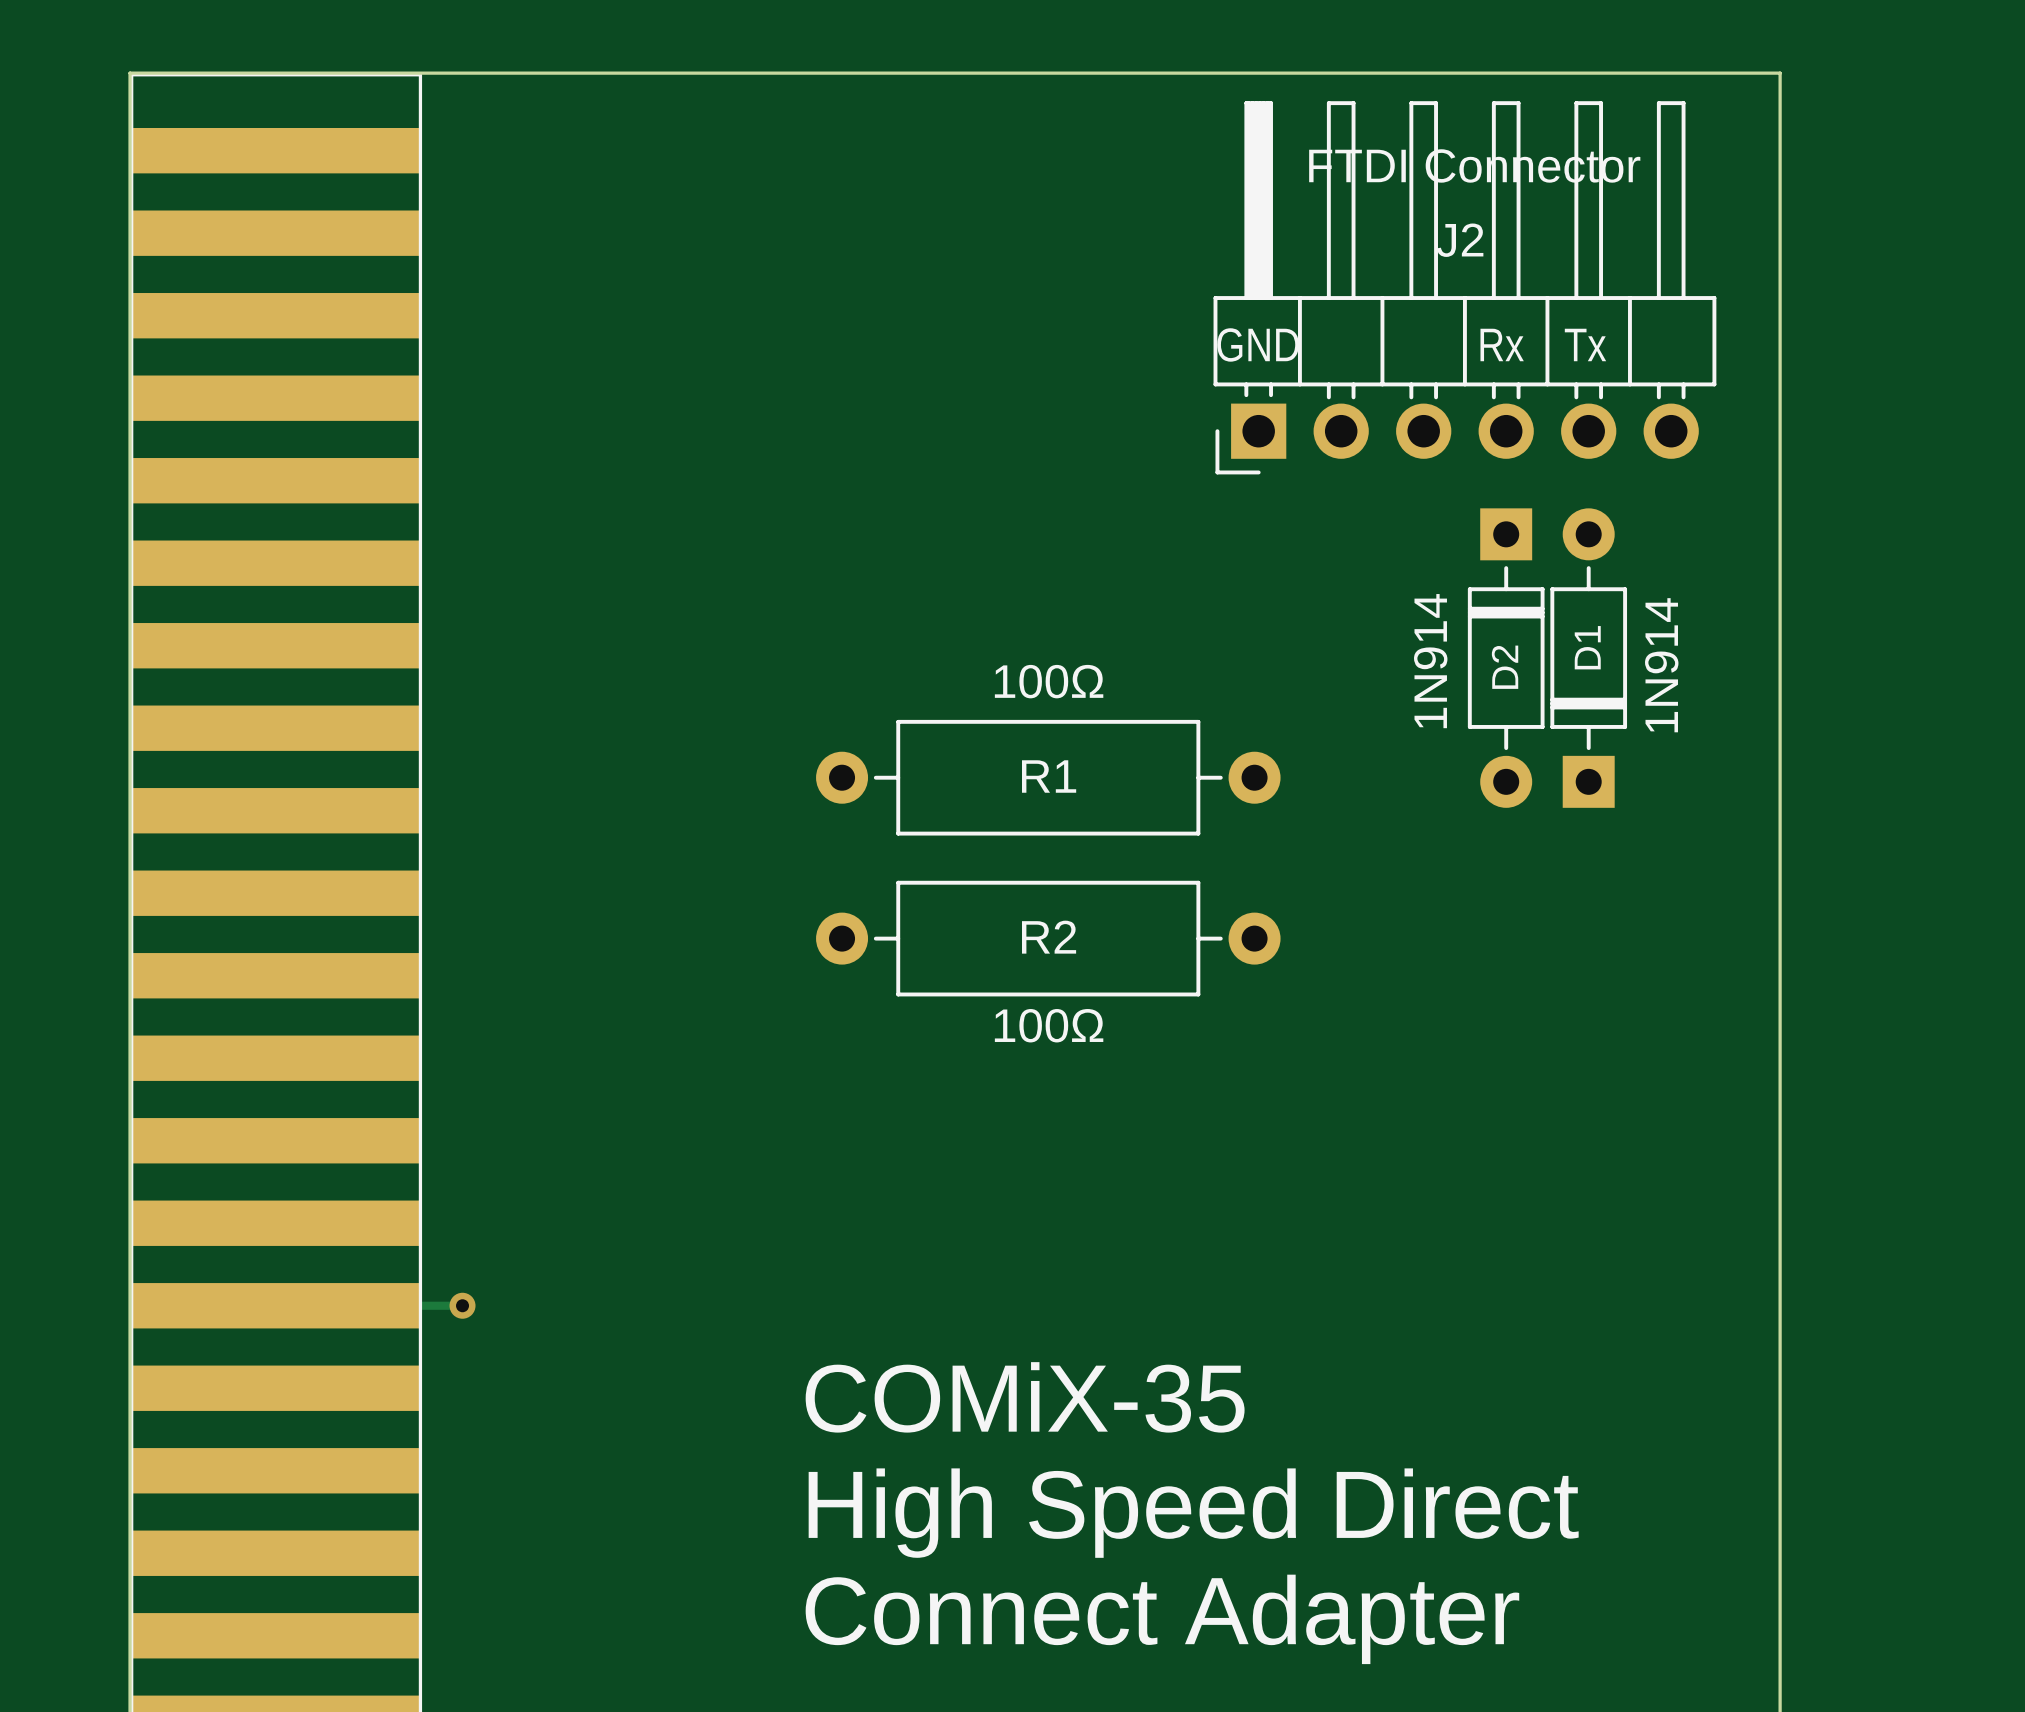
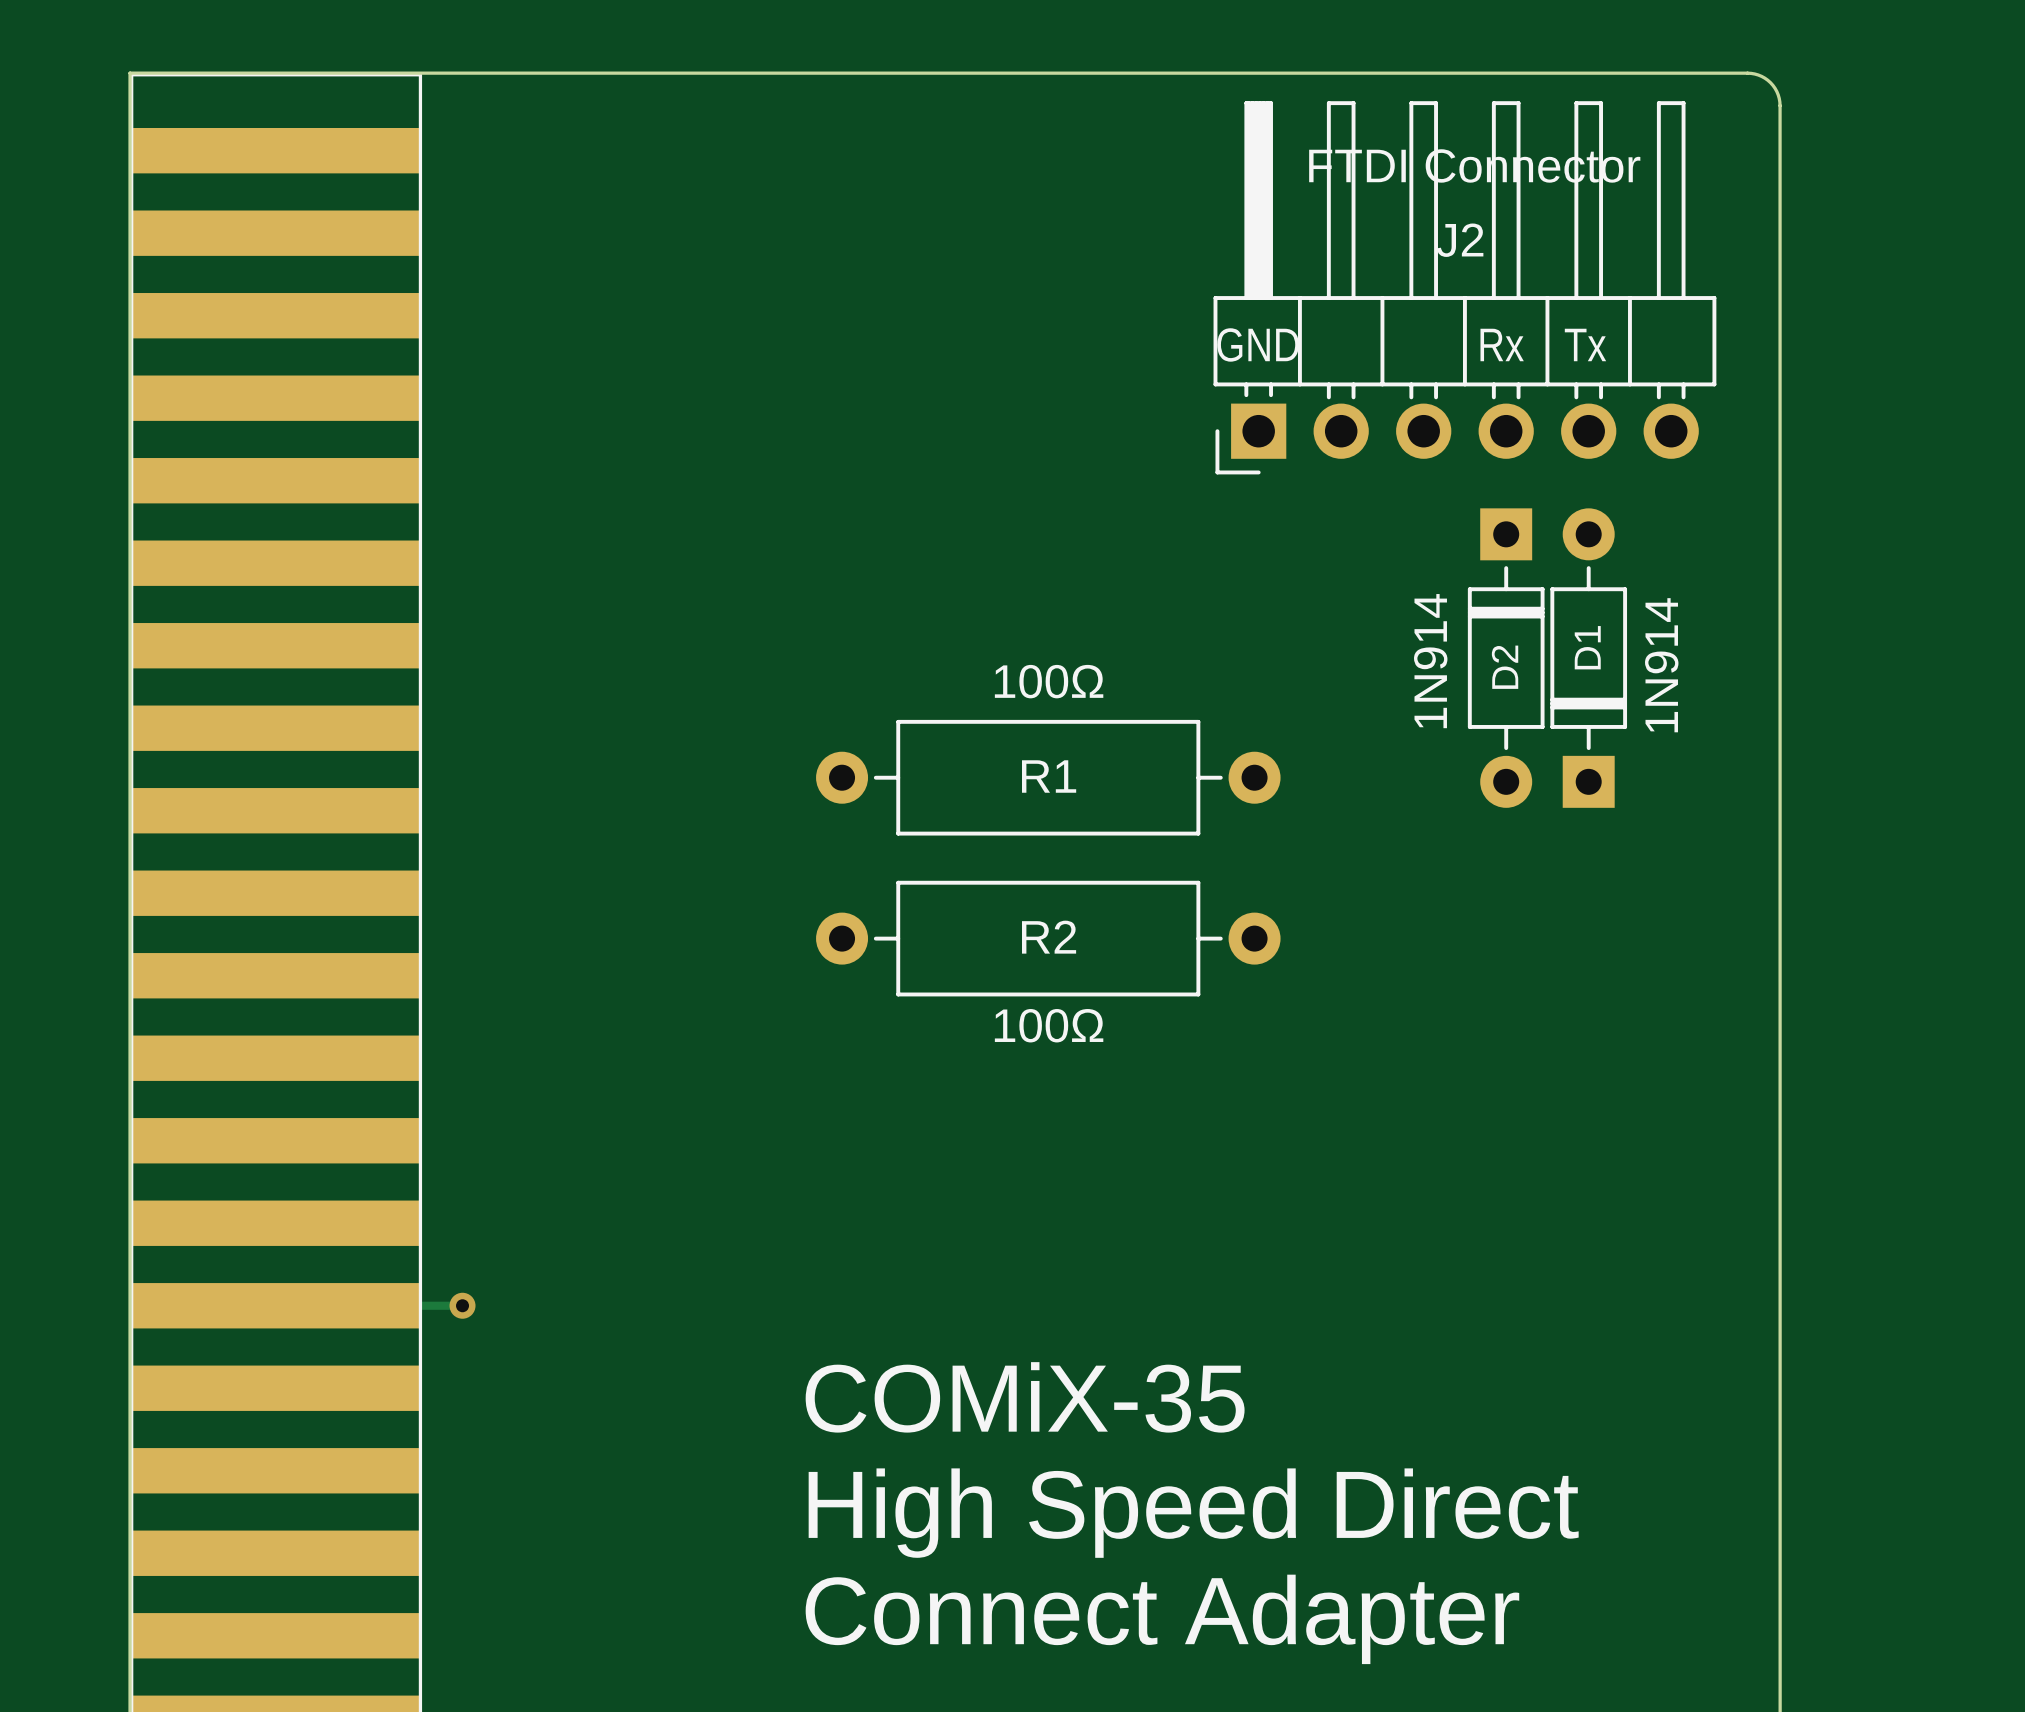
board edge: (130, 73) (1780, 73) (1780, 105) -> (130, 73) (1747, 73) (1758, 75) (1770, 82) (1778, 94) (1780, 105)

